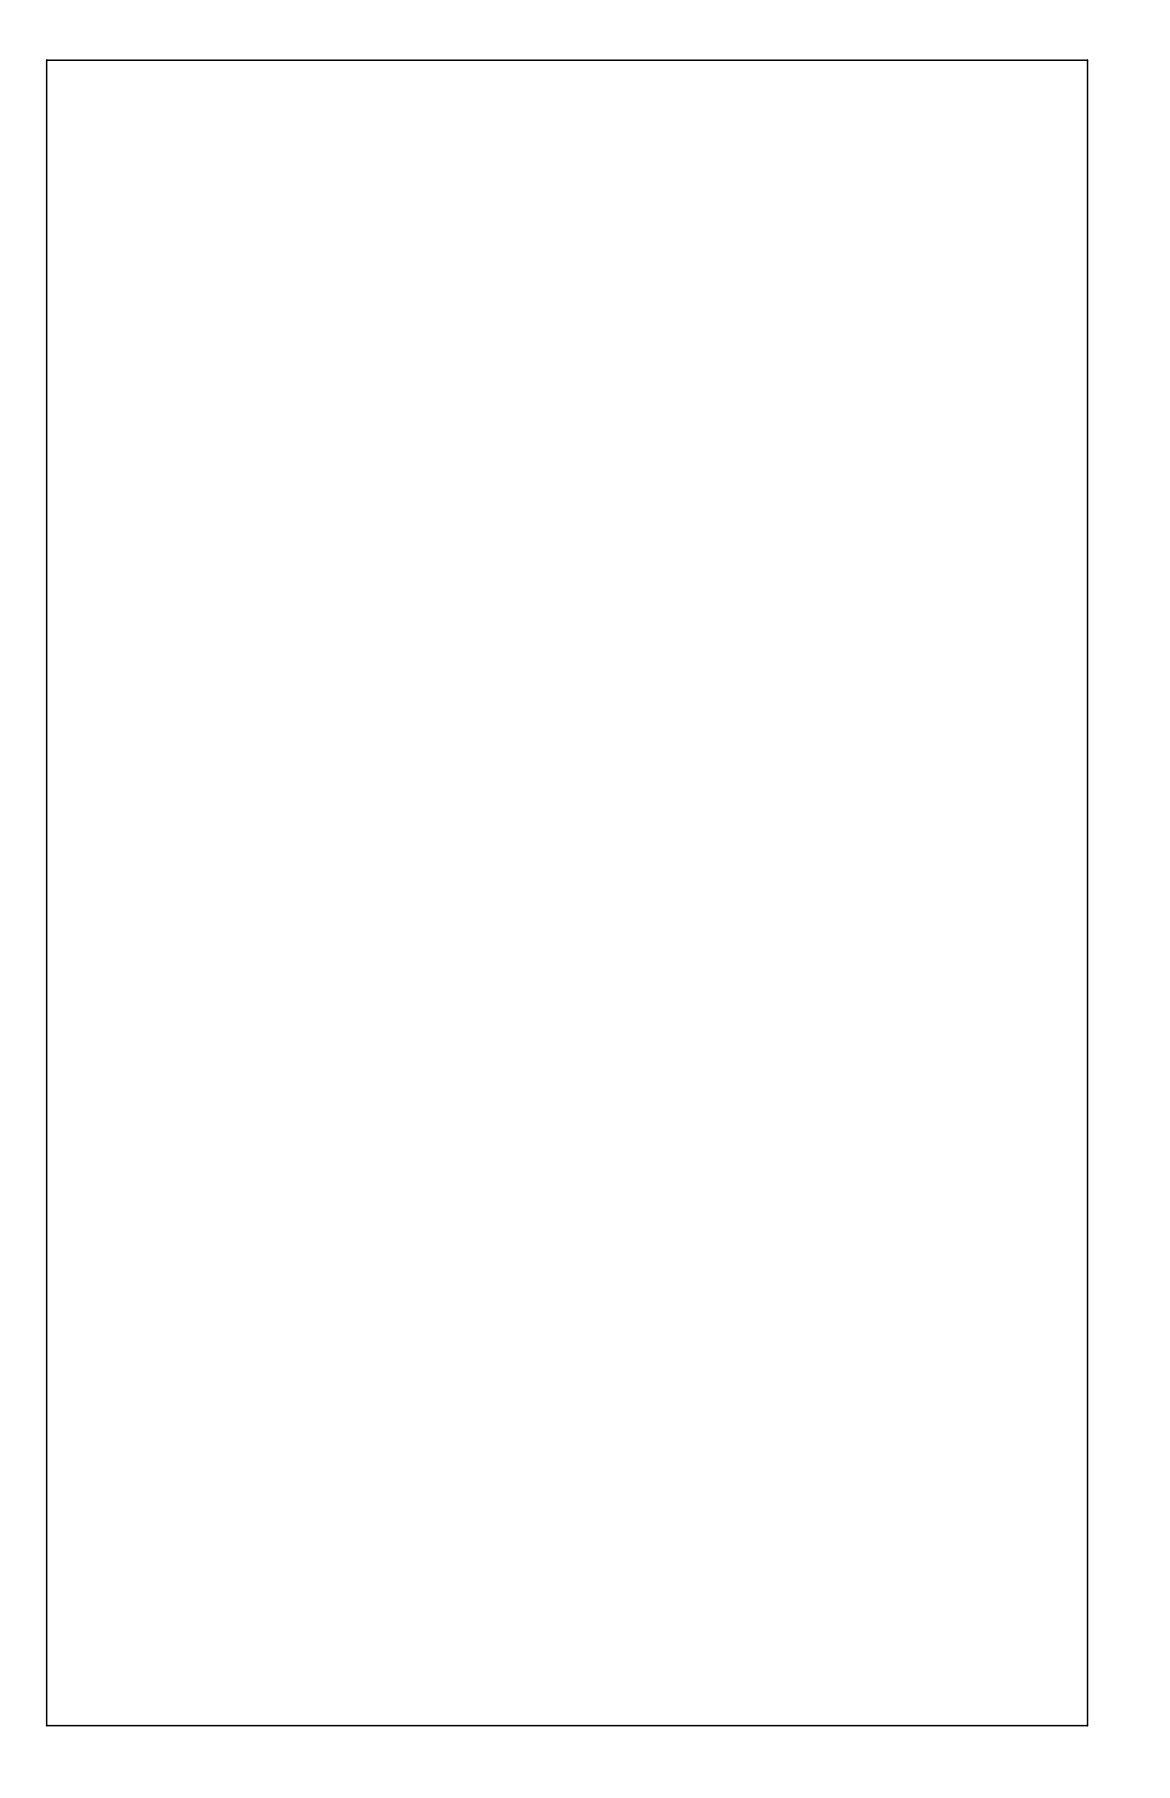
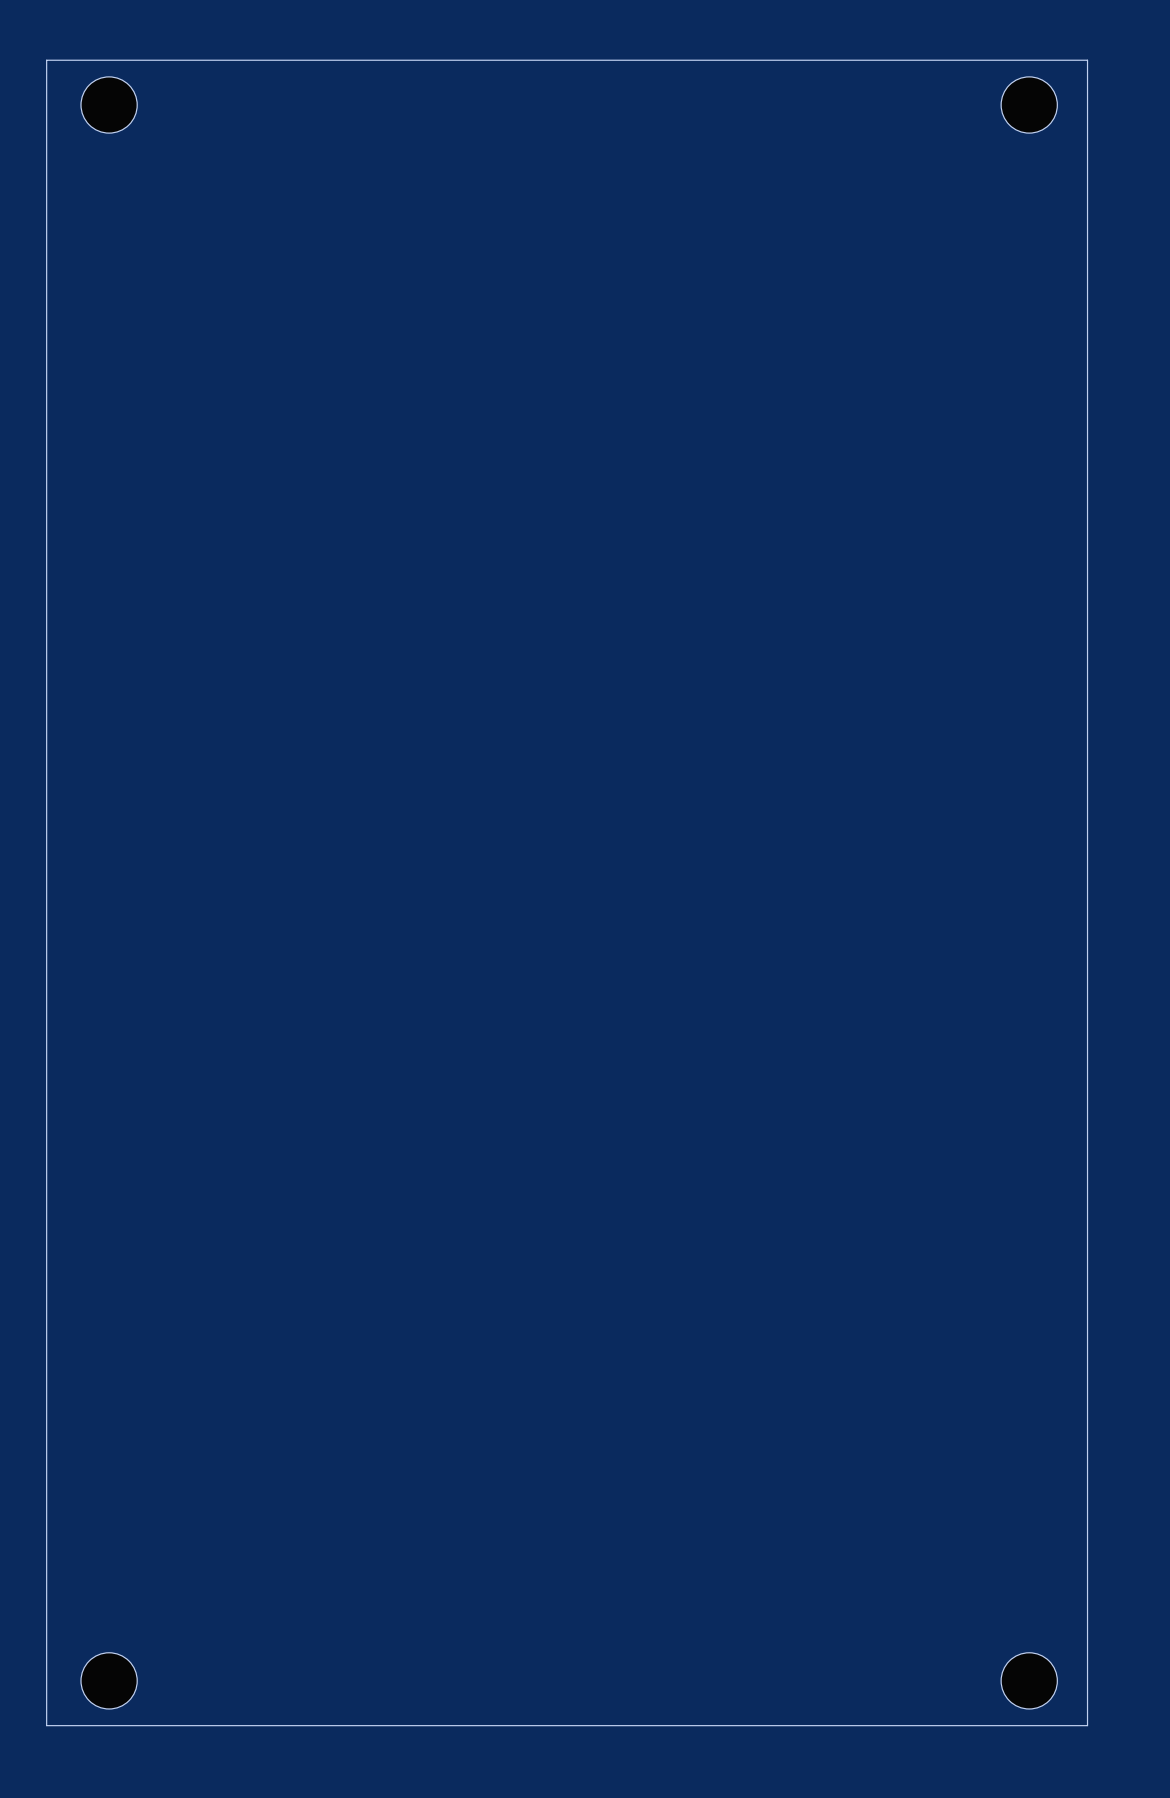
part: none -> (109, 104)
part: none -> (1029, 104)
part: none -> (109, 1680)
part: none -> (1029, 1680)

